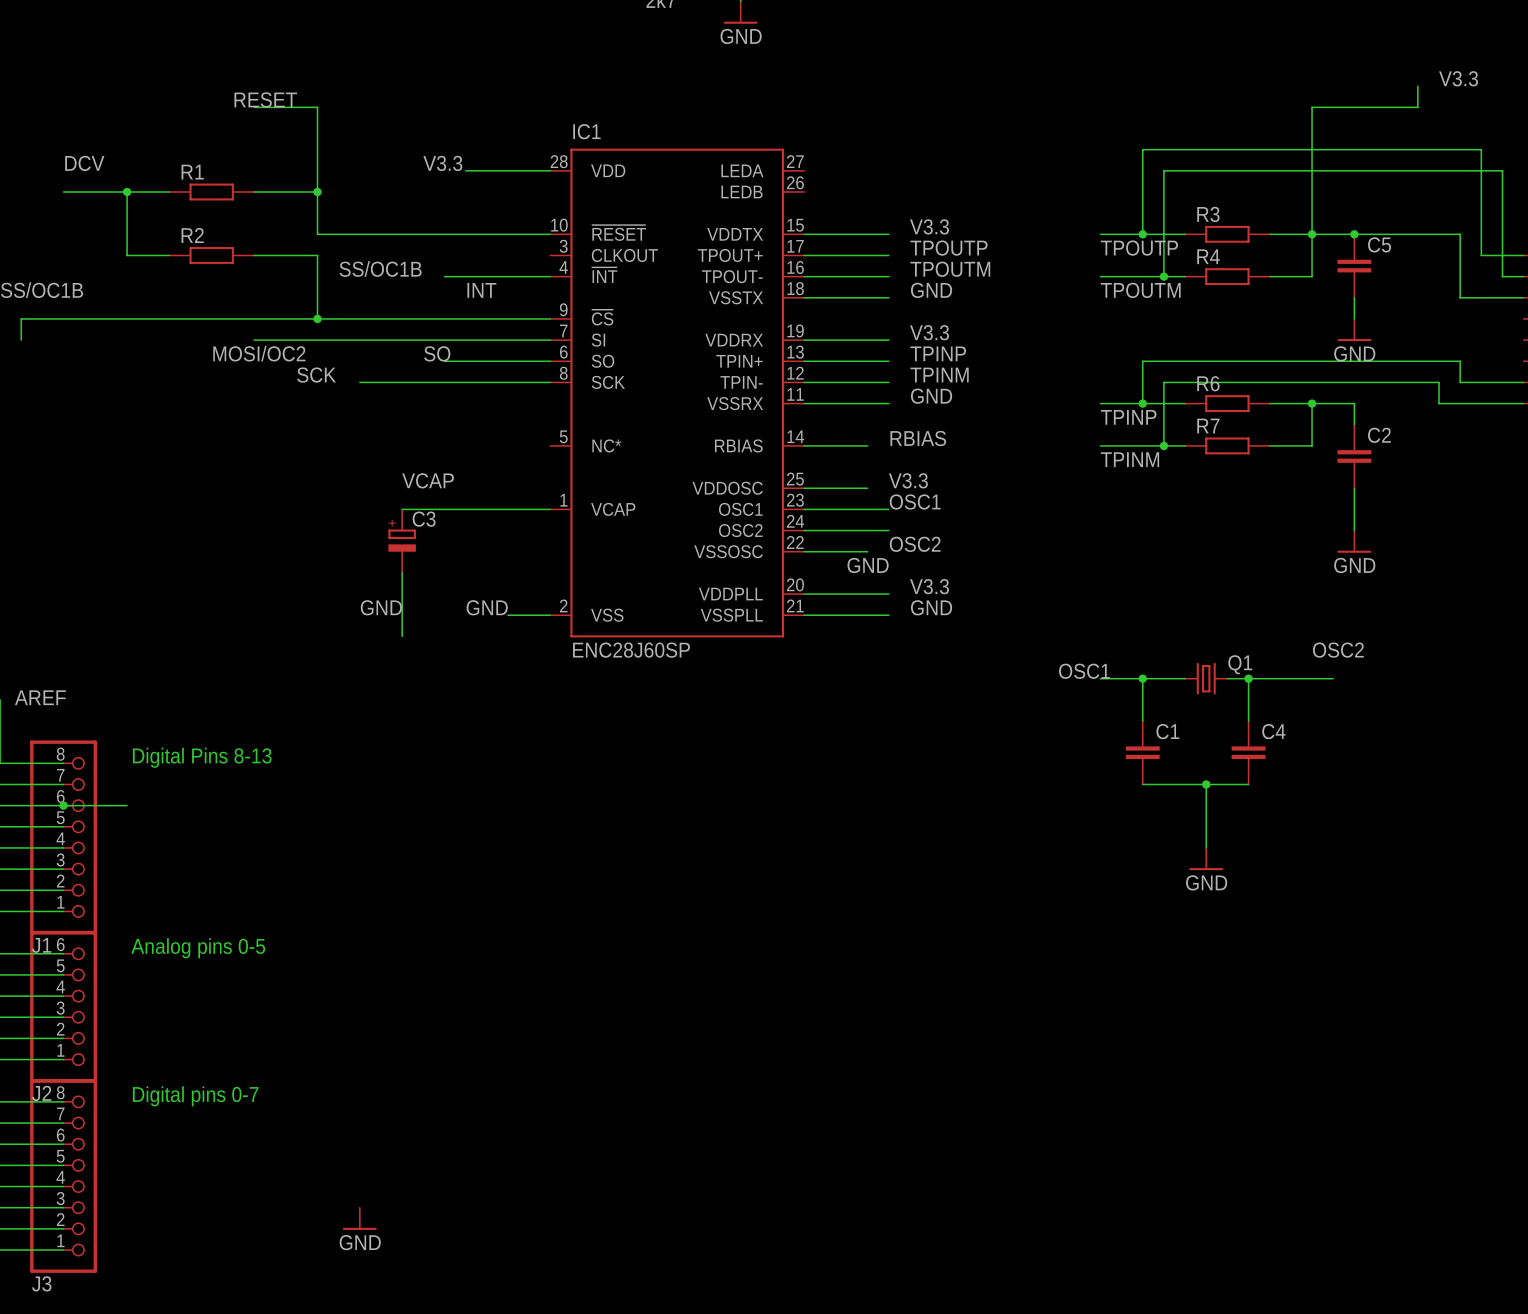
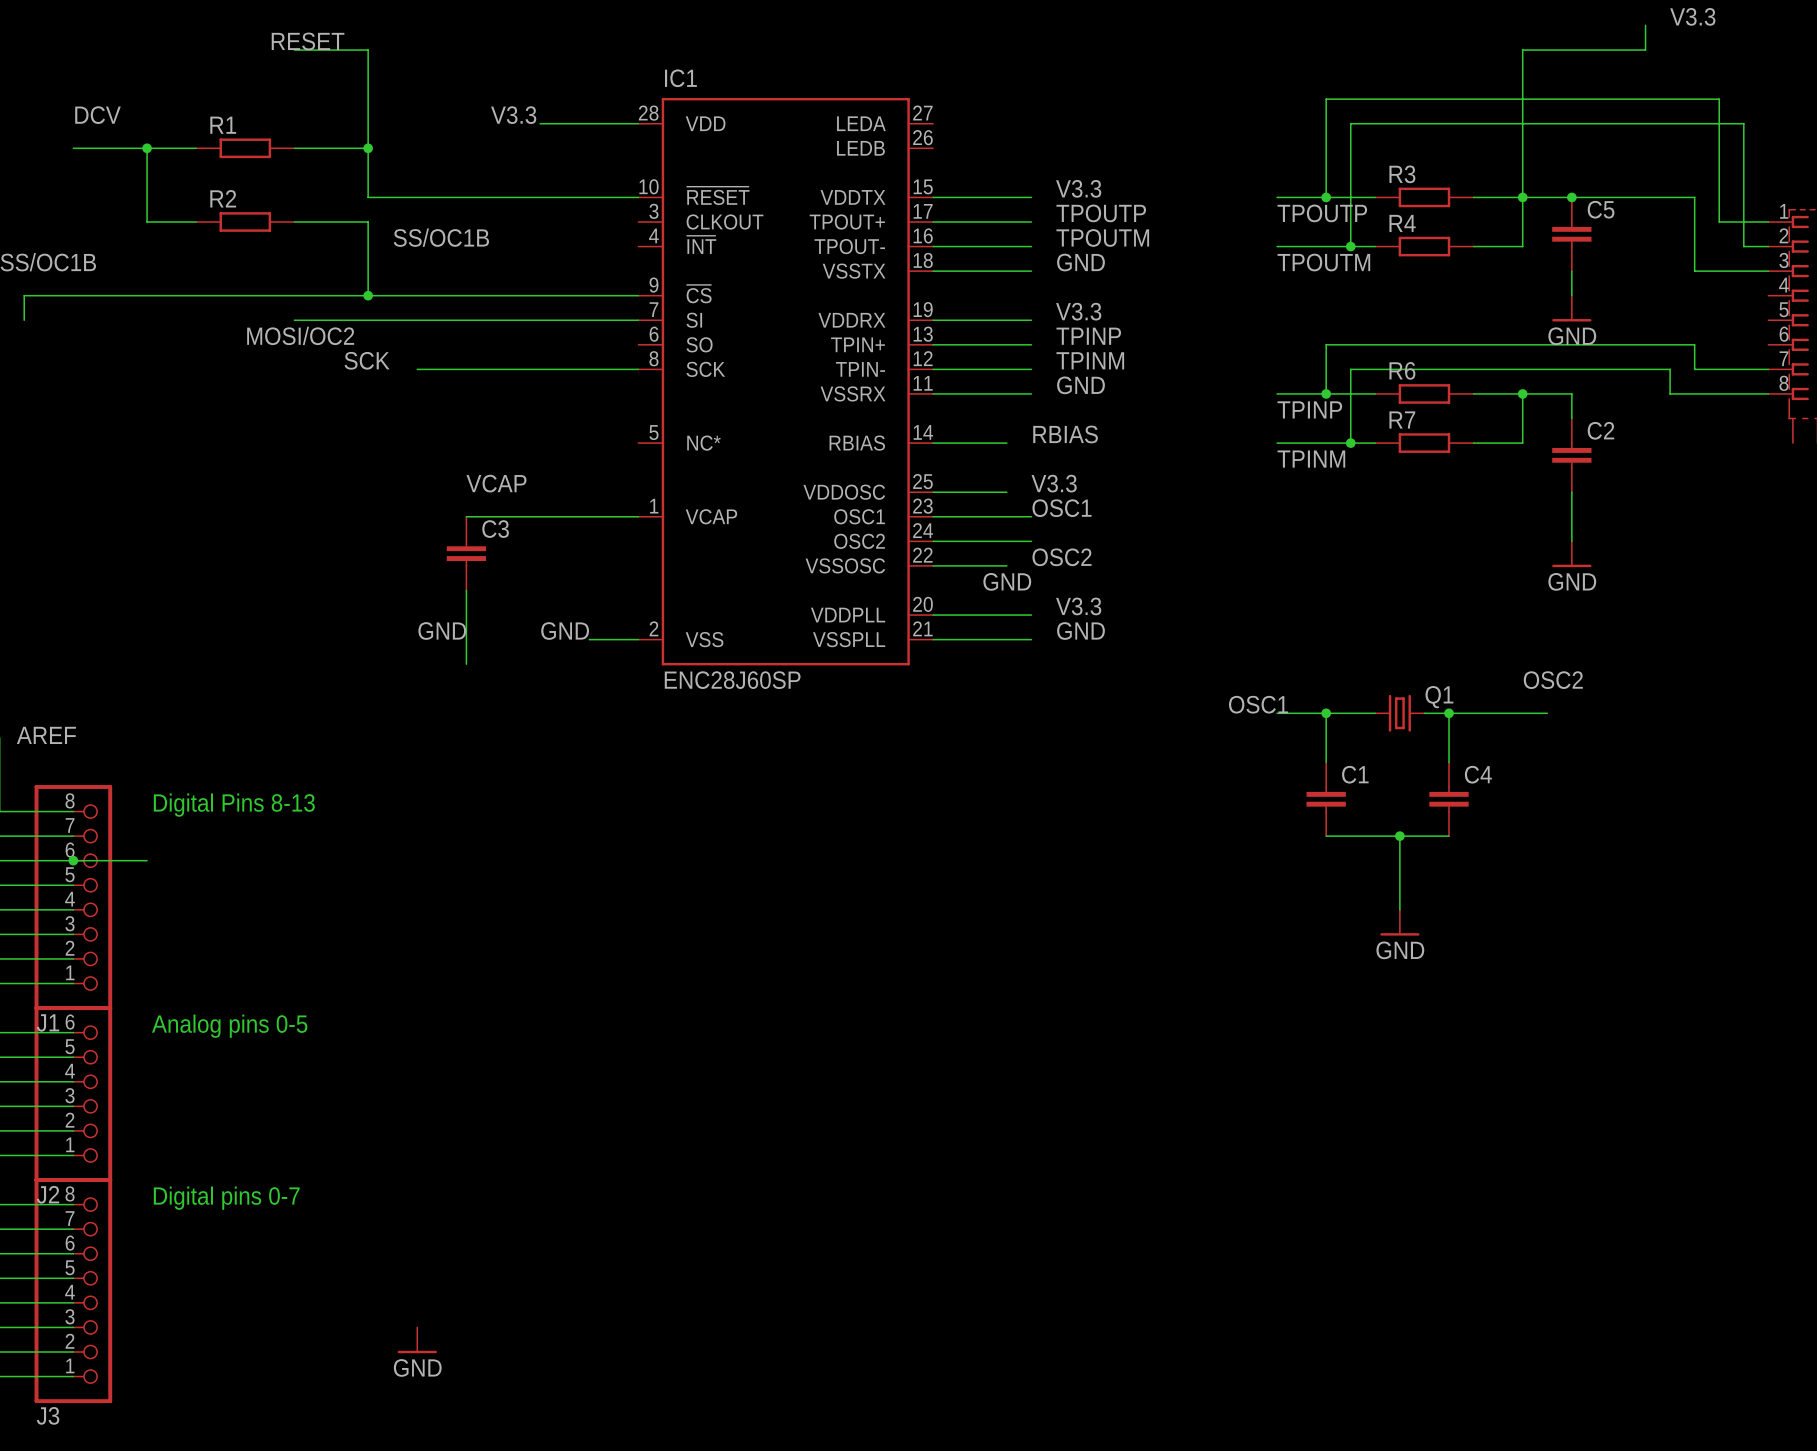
wire: (444, 276) (550, 276) -> none
label: INT (481, 290) -> none
label: SO (437, 353) -> none
wire: (444, 361) (550, 361) -> none
C3 symbol: [388, 509, 416, 573] -> [446, 516, 487, 591]

